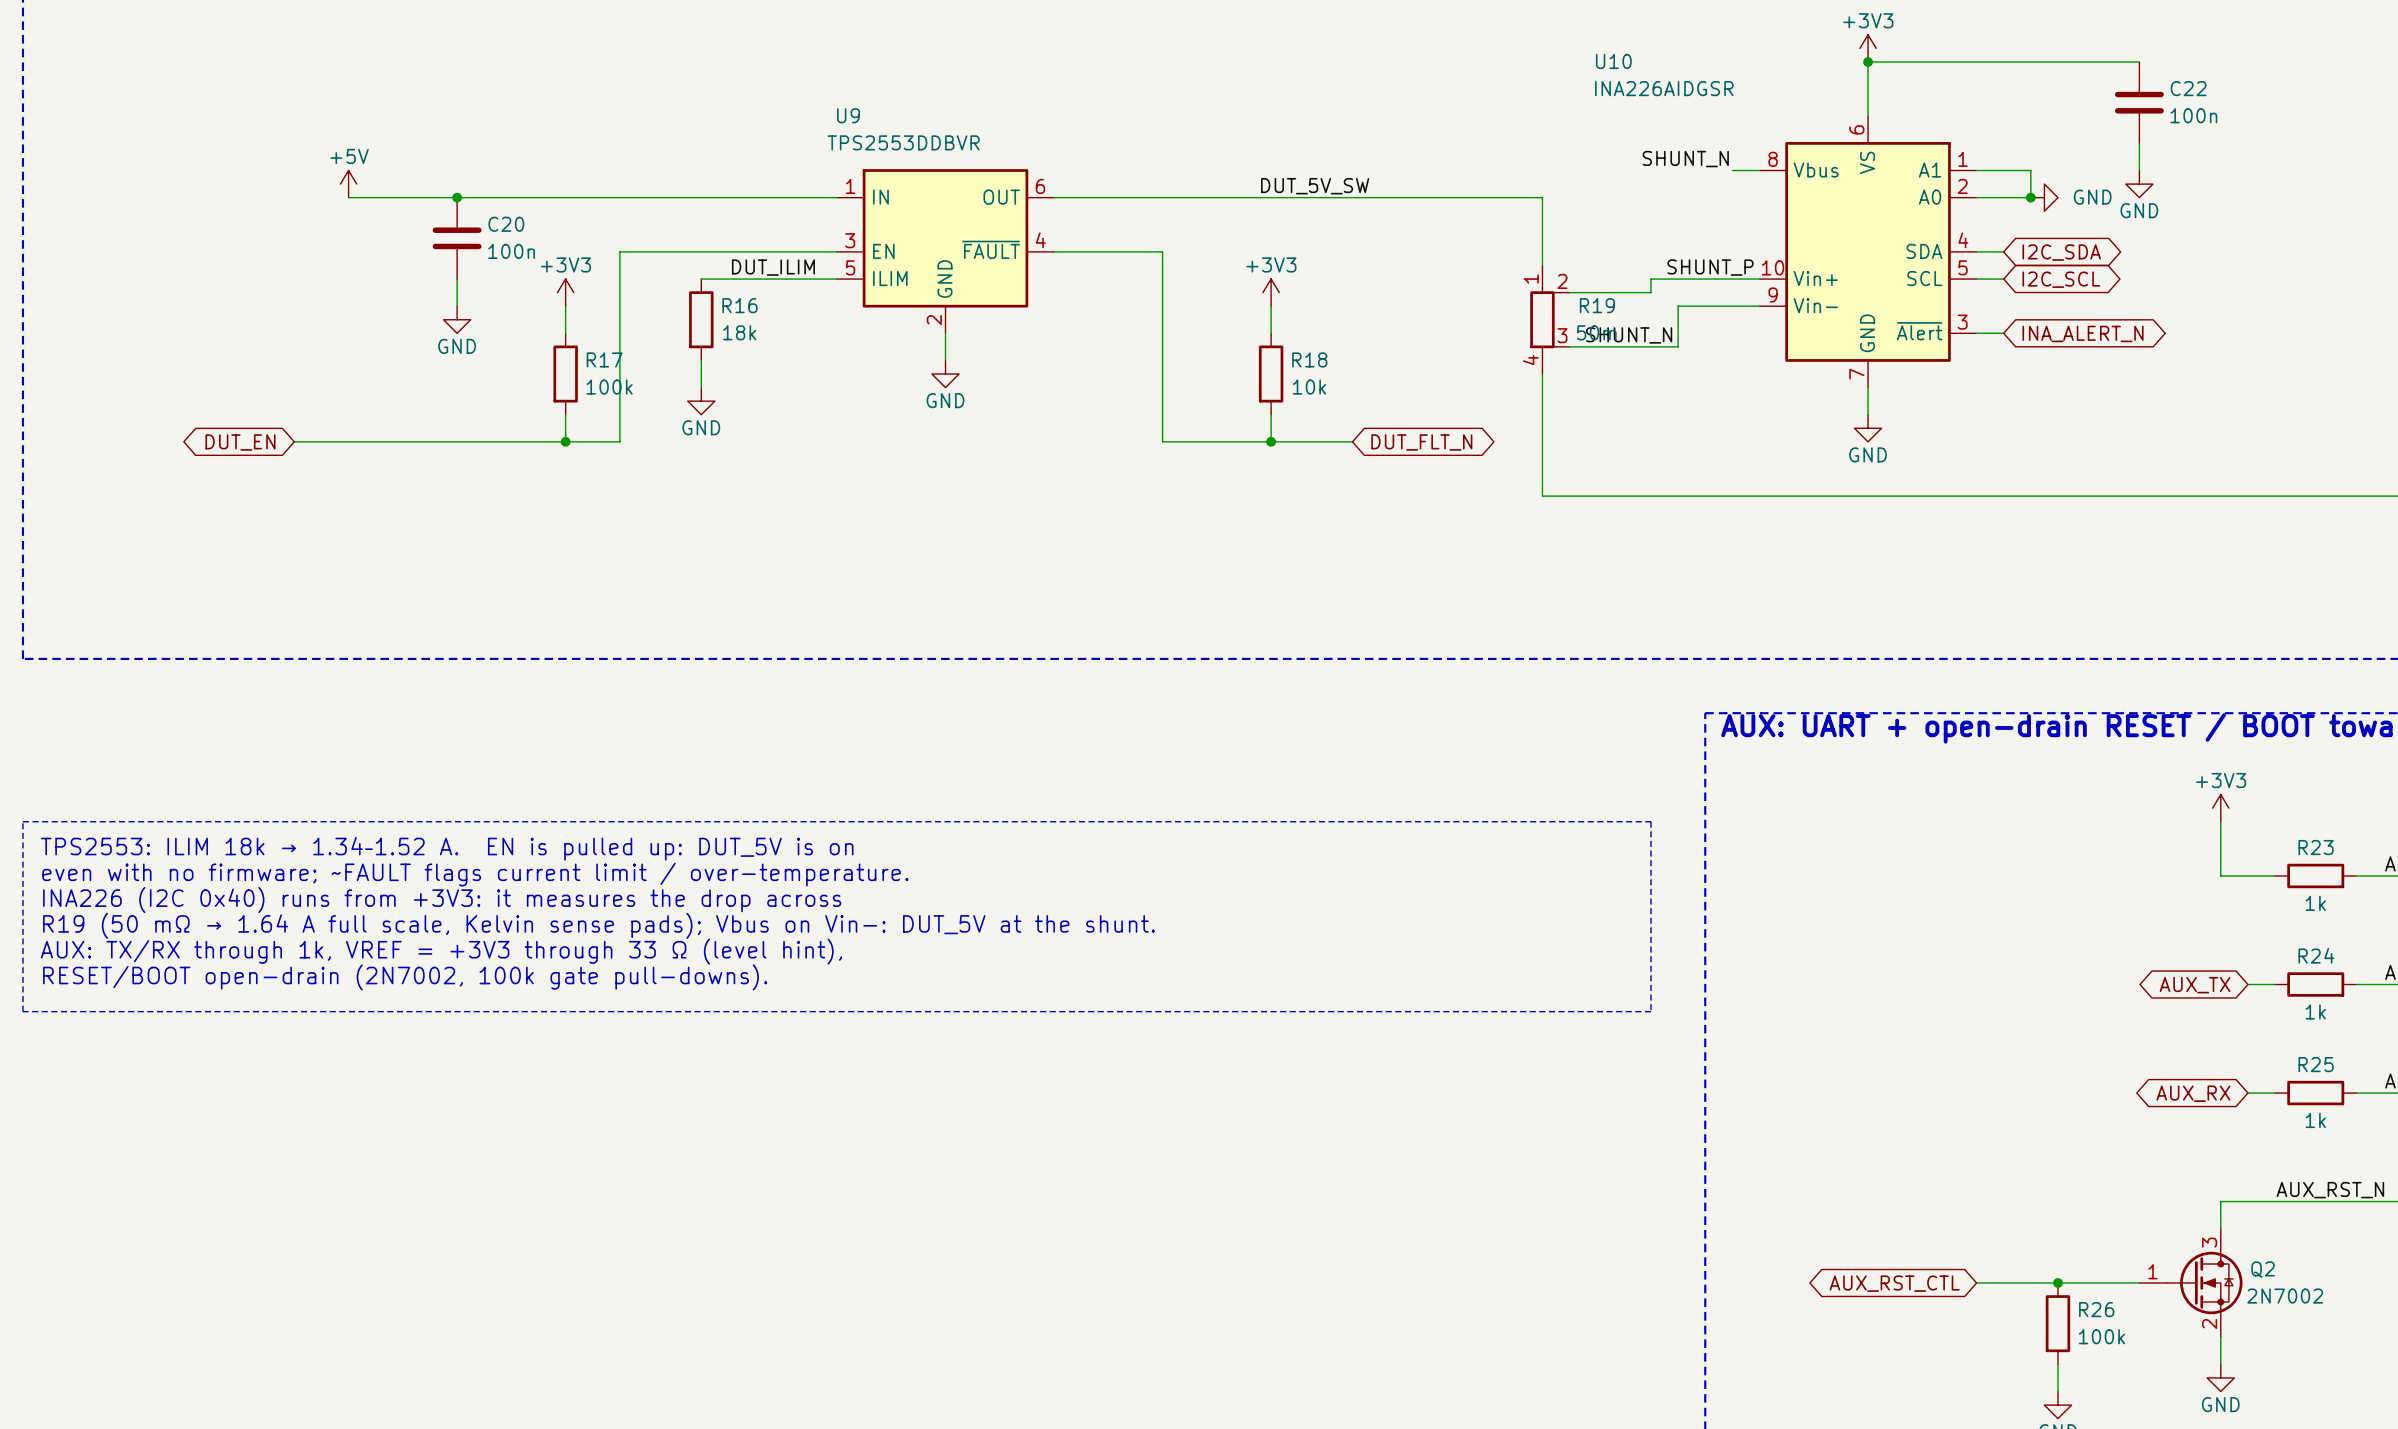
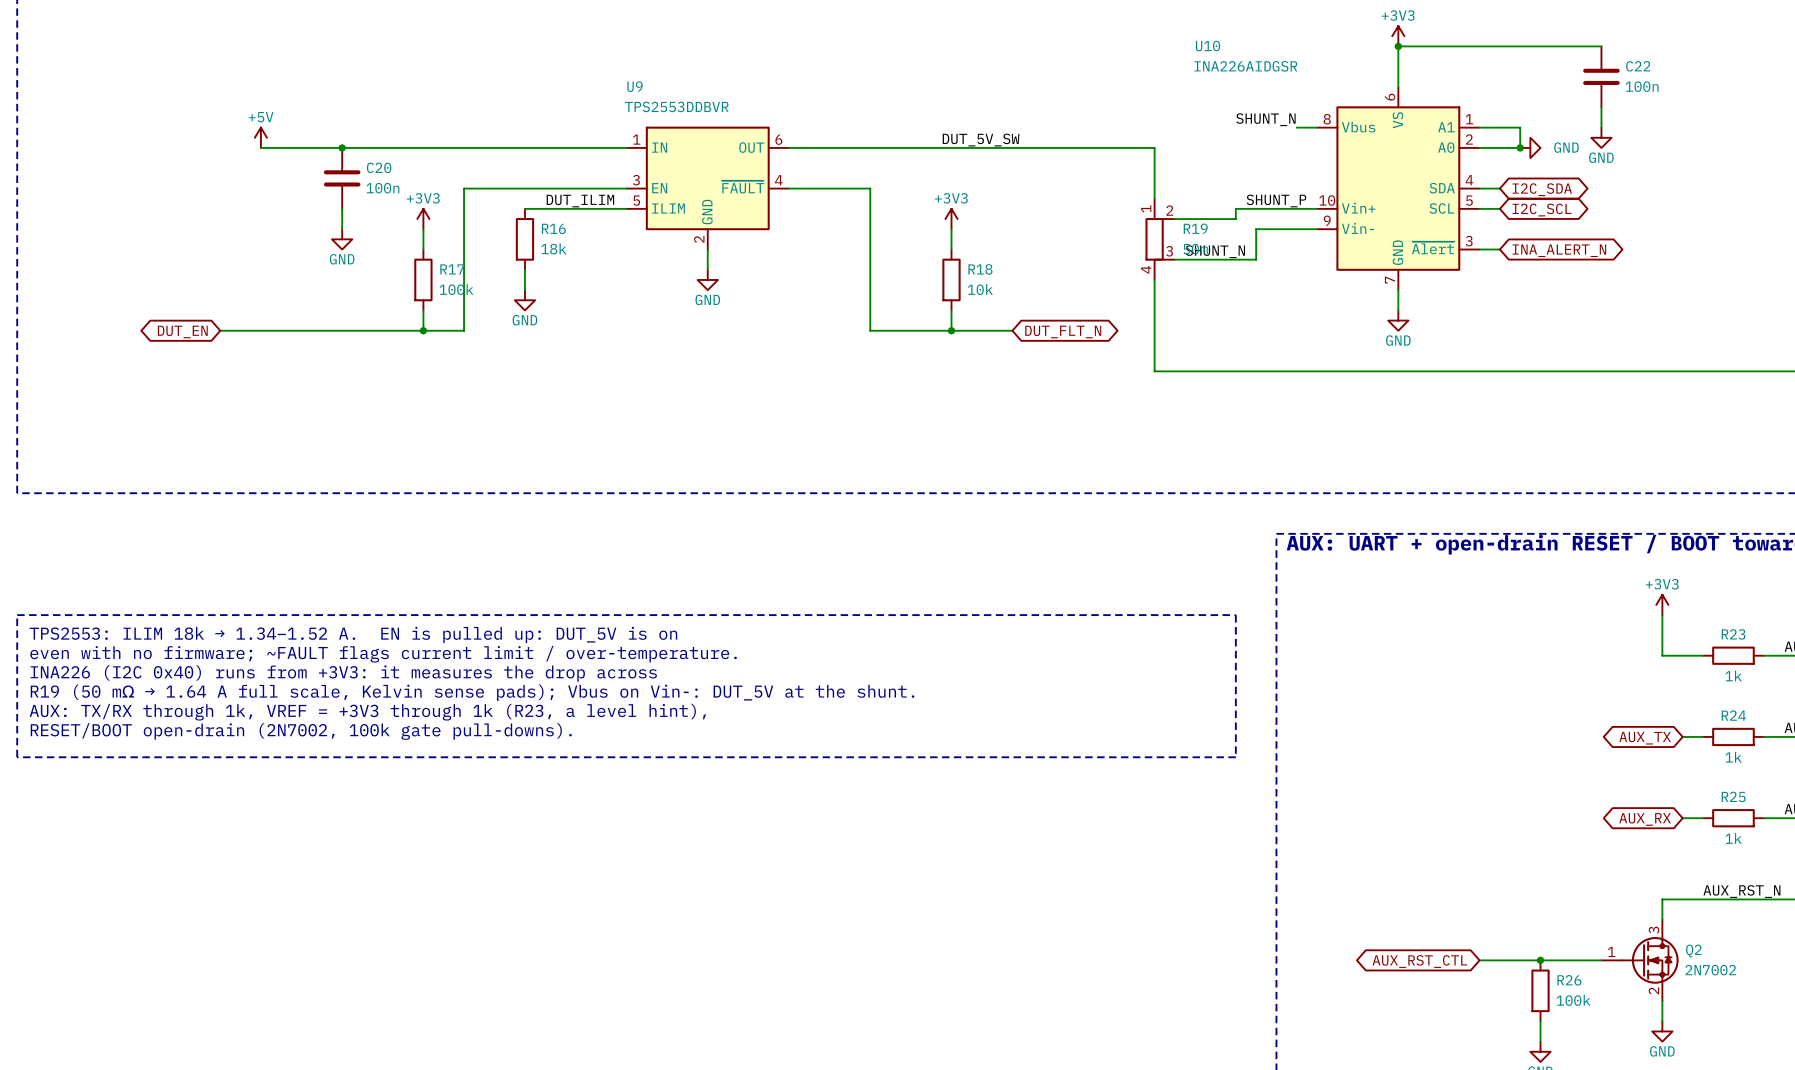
text: AUX: TX/RX through 1k, VREF = +3V3 through 33 Ω (level hint), (441, 951) -> AUX: TX/RX through 1k, VREF = +3V3 through 1k (R23, a level hint), (367, 712)

